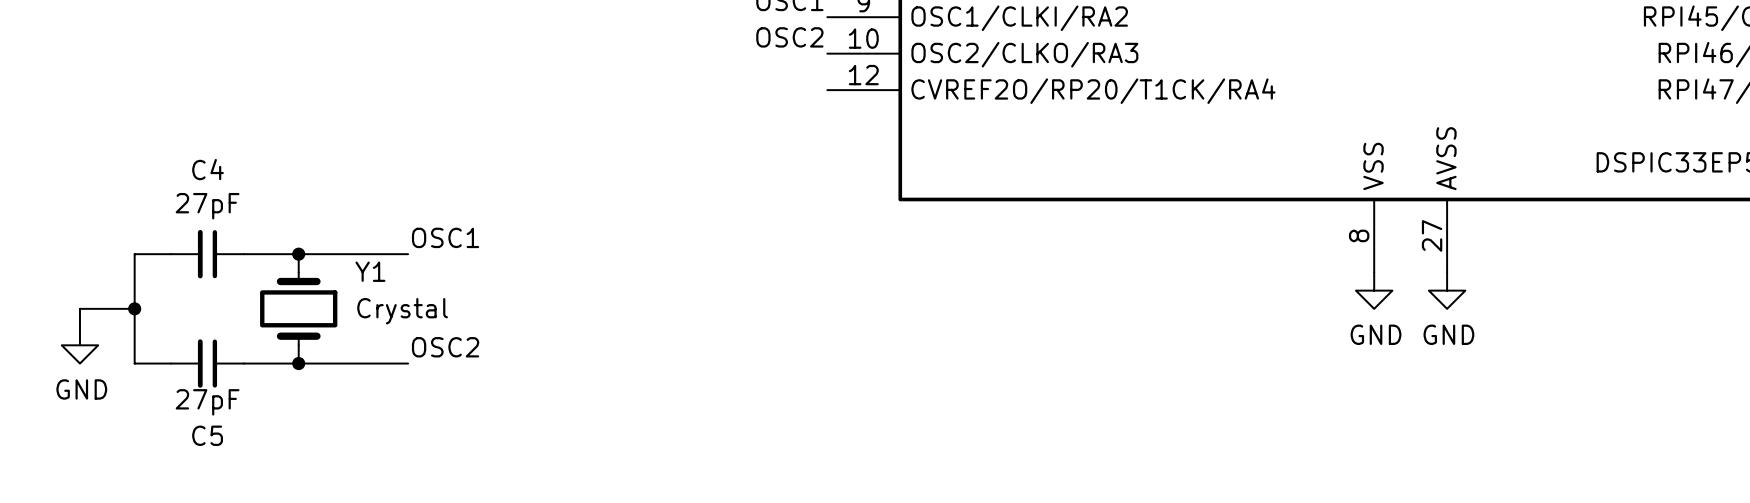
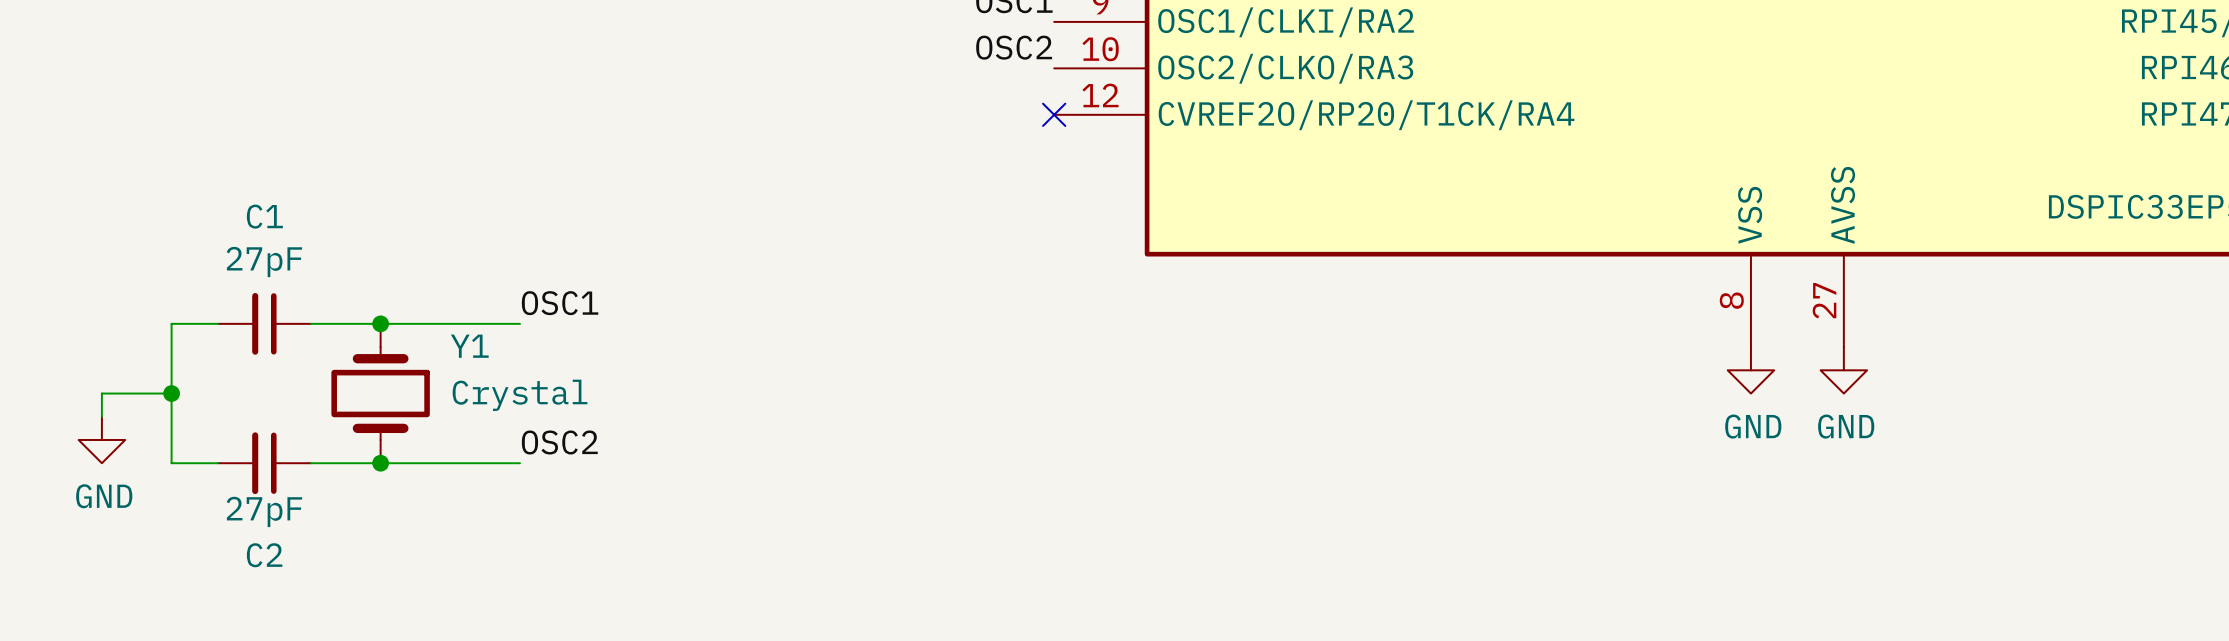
no-connect mark: none -> (1054, 114)
C4 name: C4 (208, 169) -> C1 (264, 216)
C5 name: C5 (207, 435) -> C2 (264, 555)

